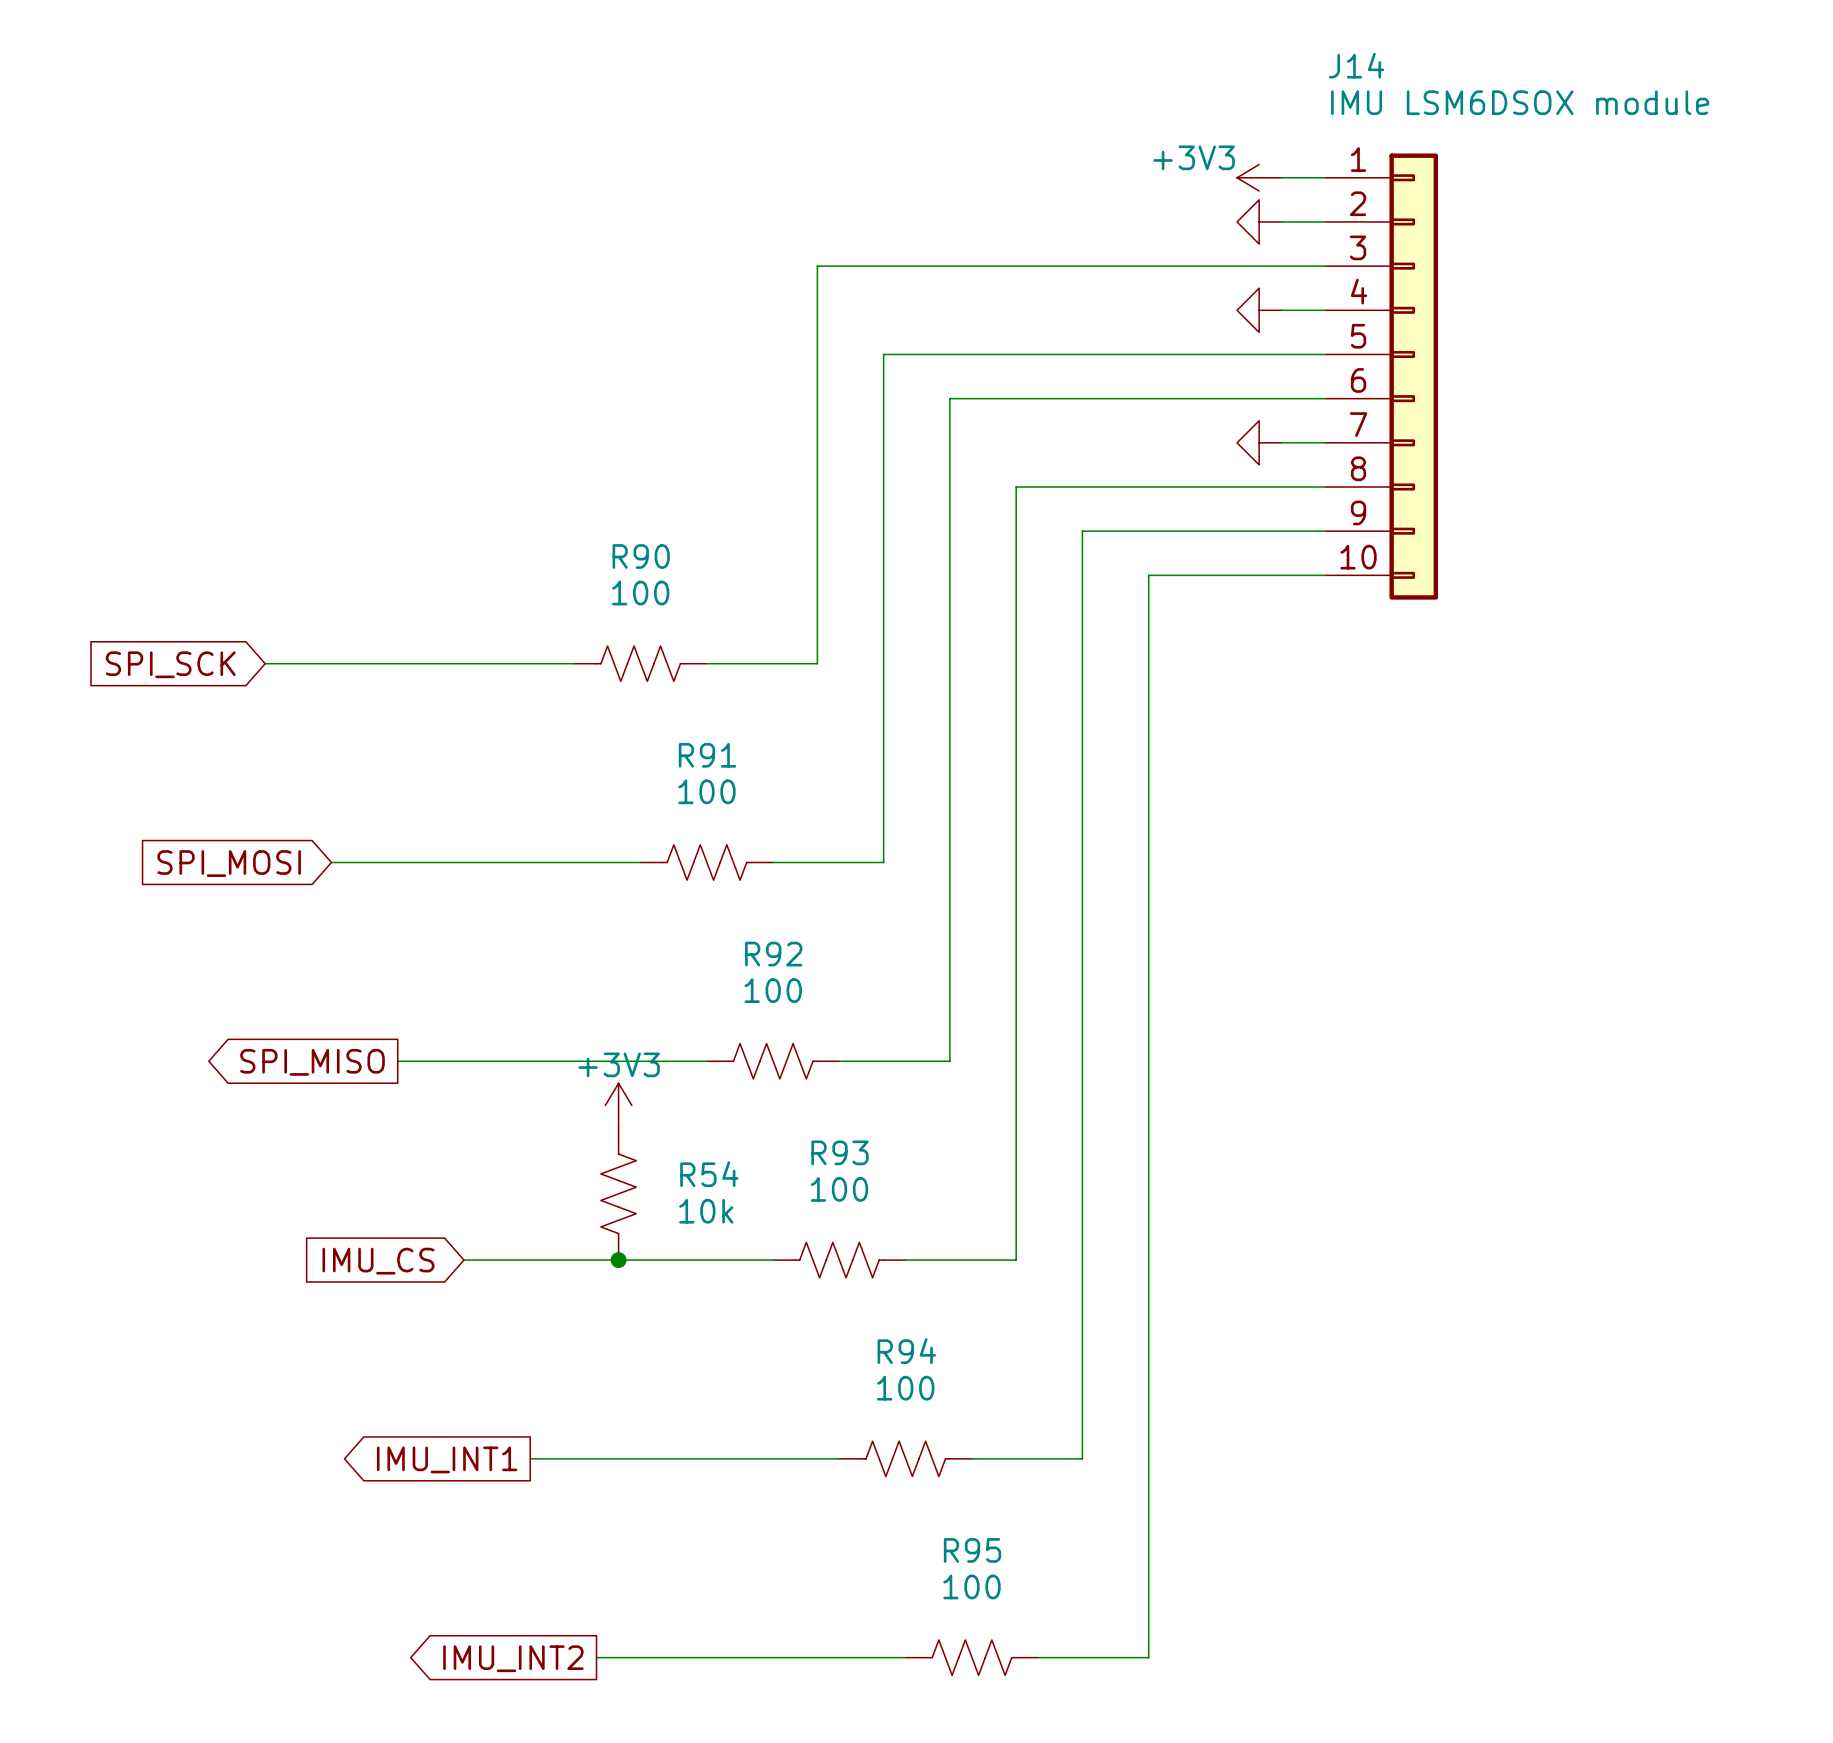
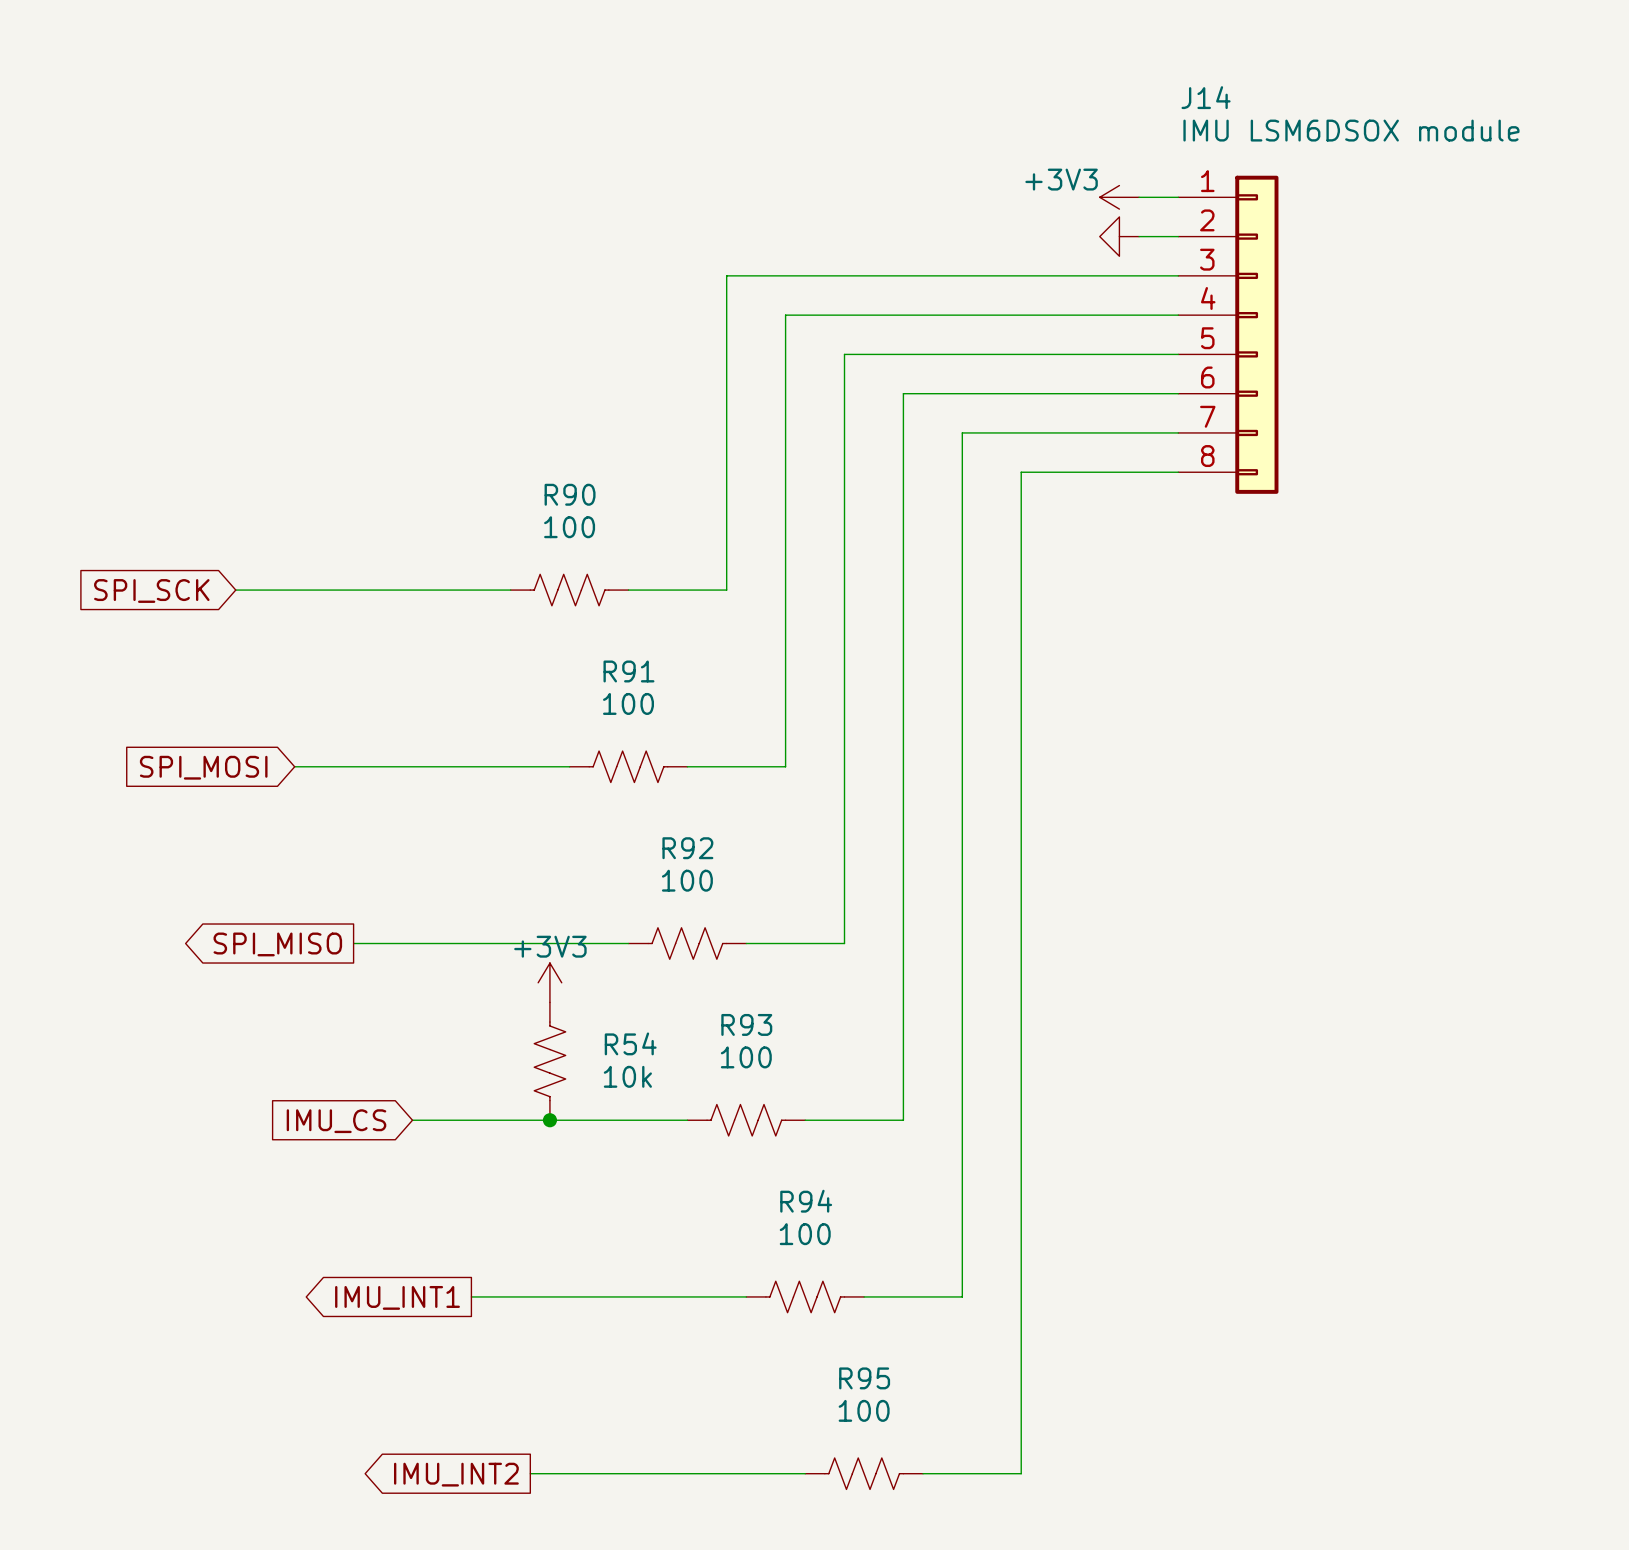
J14 name position: J14 (1356, 65) -> J14 (1206, 97)
J14 value position: IMU LSM6DSOX module (1520, 102) -> IMU LSM6DSOX module (1351, 130)
J14 symbol: [1325, 153, 1439, 600] -> [1178, 175, 1279, 494]
power symbol: +3V3 (1259, 177) -> none
wire: (1281, 177) (1325, 177) -> none
power symbol shape: [1237, 199, 1282, 245] -> [1099, 185, 1140, 210]
power symbol text: none -> +3V3 (1061, 179)
wire: (1281, 266) (817, 266) (817, 310) -> (1139, 275) (726, 275)
power symbol position: (1259, 310) -> (1119, 236)
power symbol: (1259, 442) -> none
wire: none -> (1139, 393) (903, 393) (903, 432)
wire: (1016, 487) (1082, 487) -> (962, 472) (962, 432)
wire: (1082, 531) (1148, 531) -> (1021, 511) (1021, 472)
wire: (1148, 575) (1325, 575) -> none

